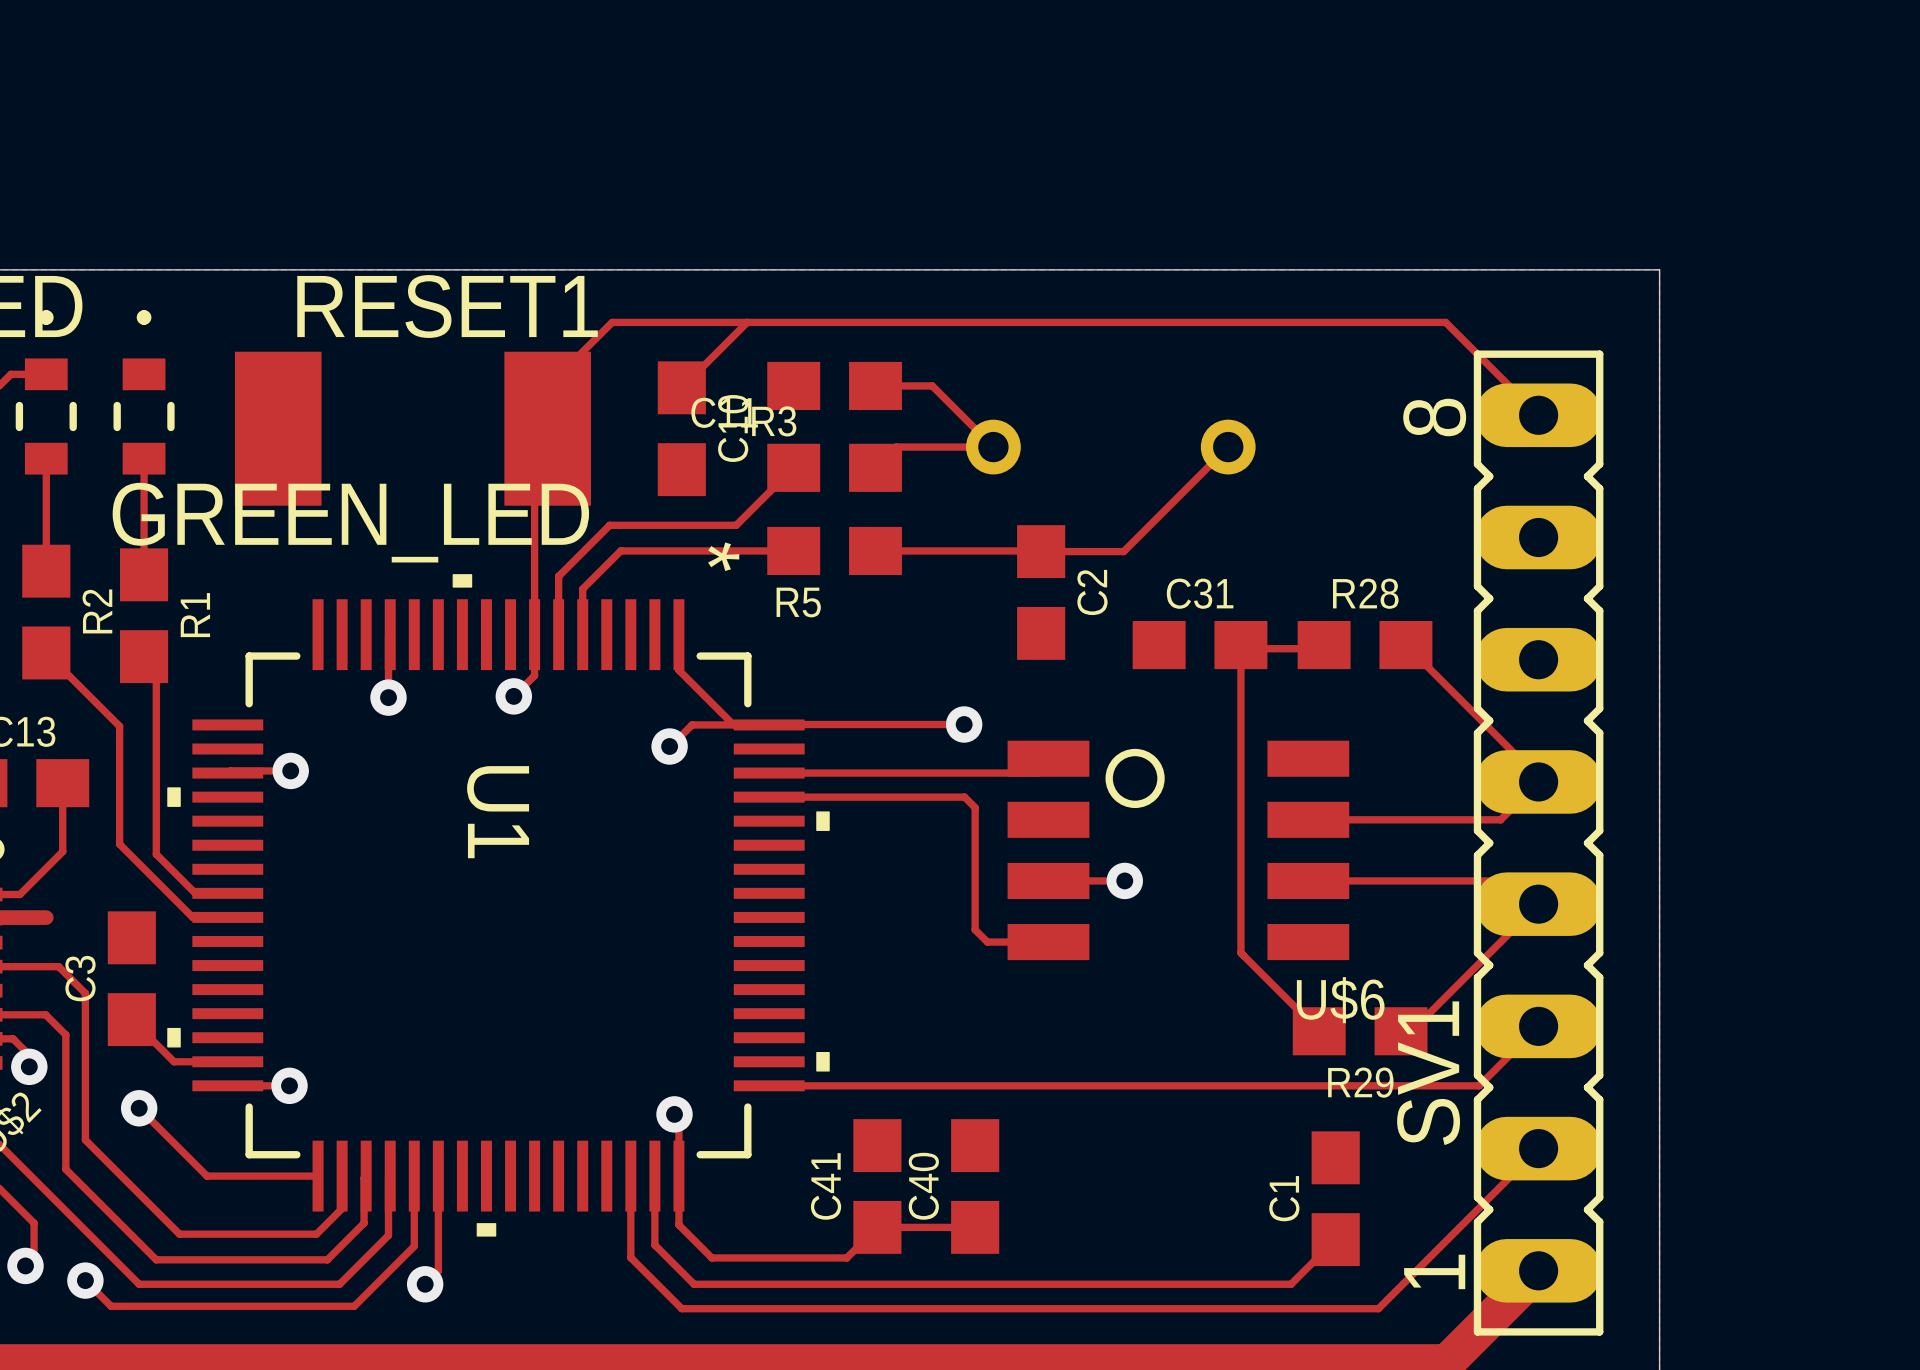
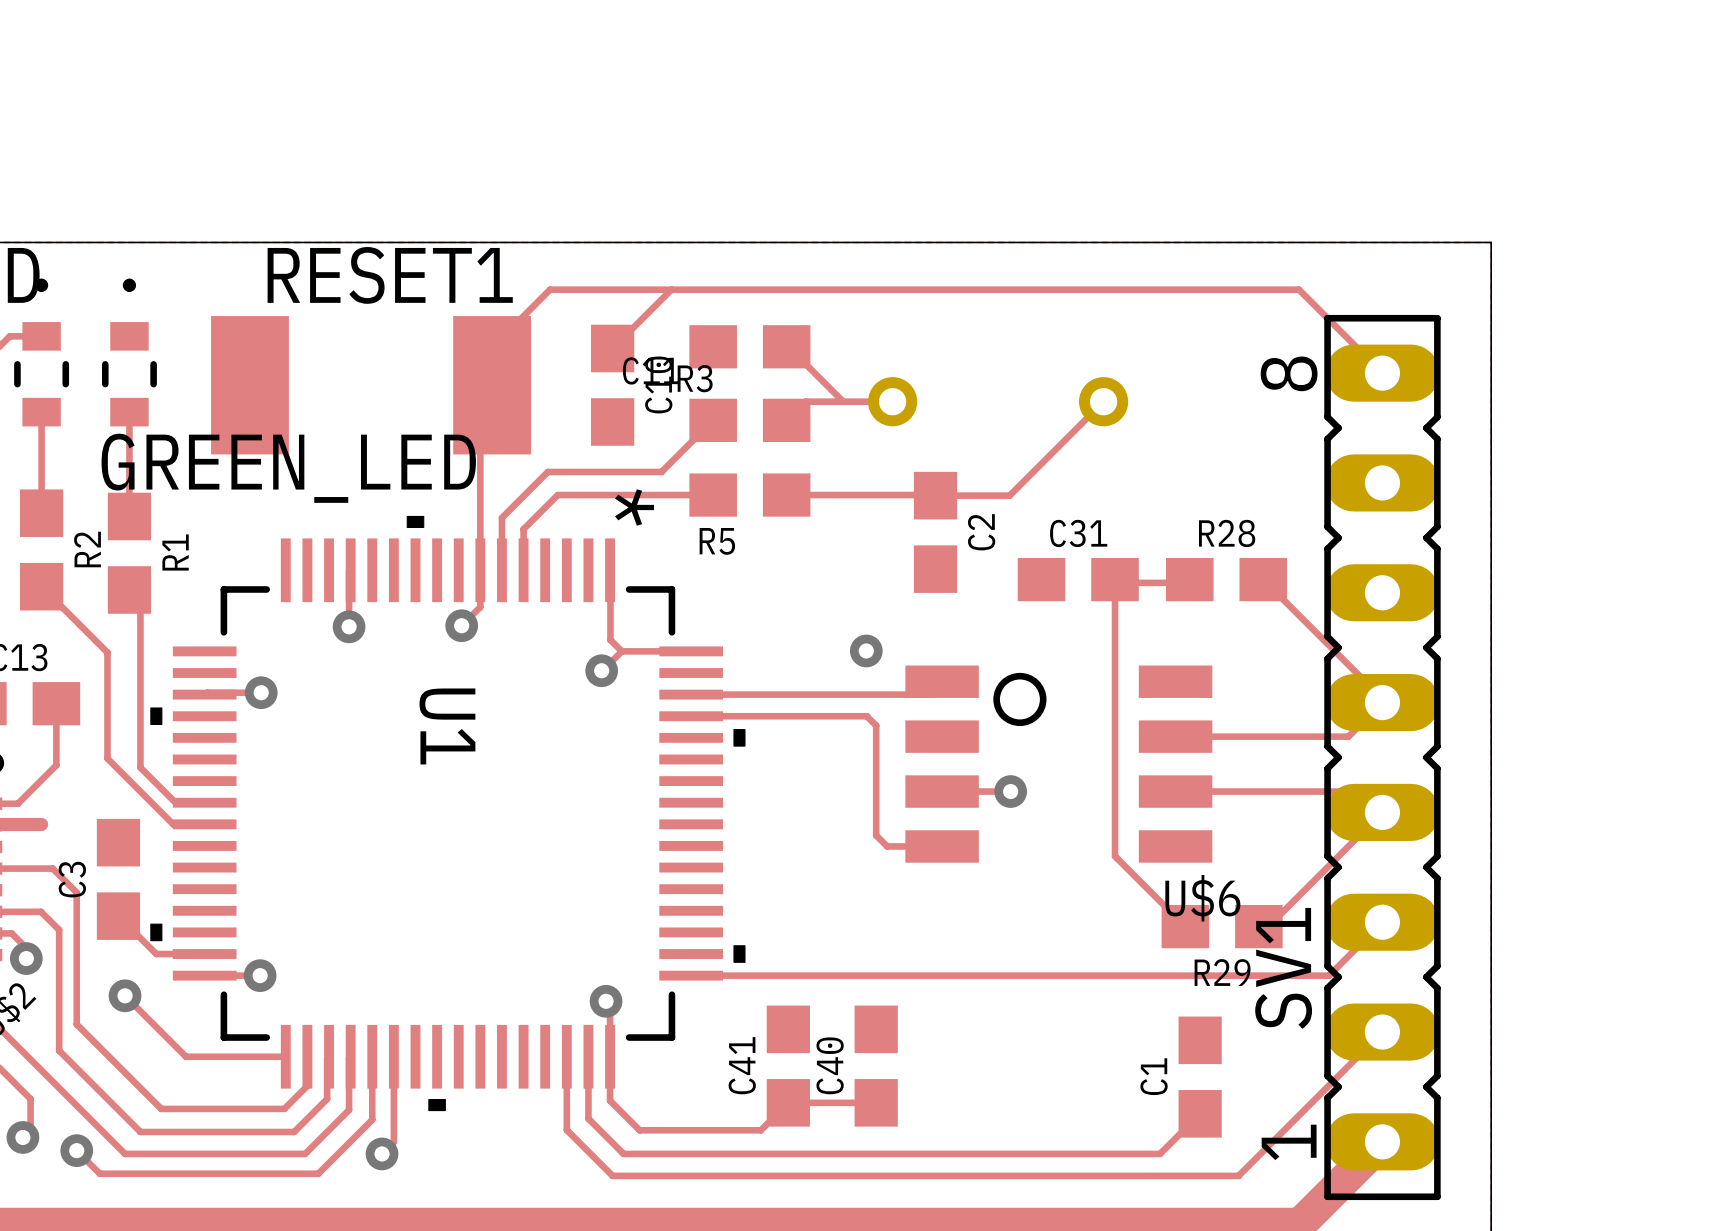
track: (877, 385) (932, 385) (993, 447) -> (788, 346) (843, 401)
track: (678, 634) (678, 670) (733, 724) (964, 724) -> (610, 570) (610, 640) (621, 651)

